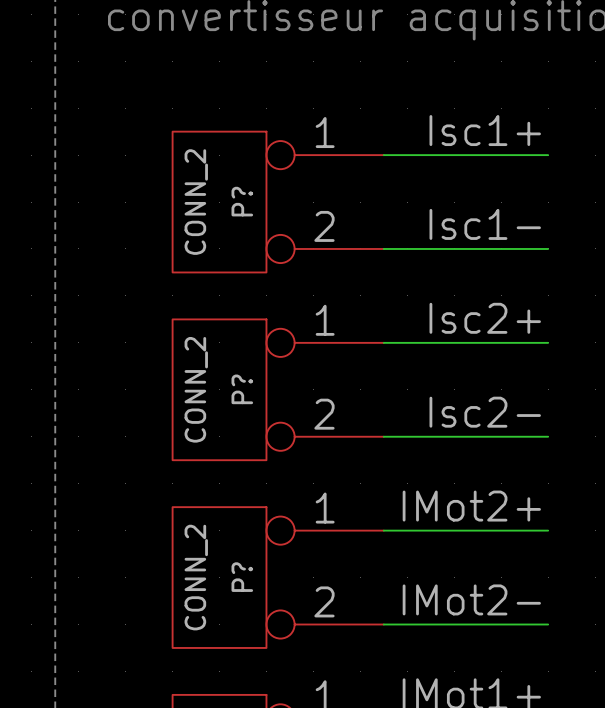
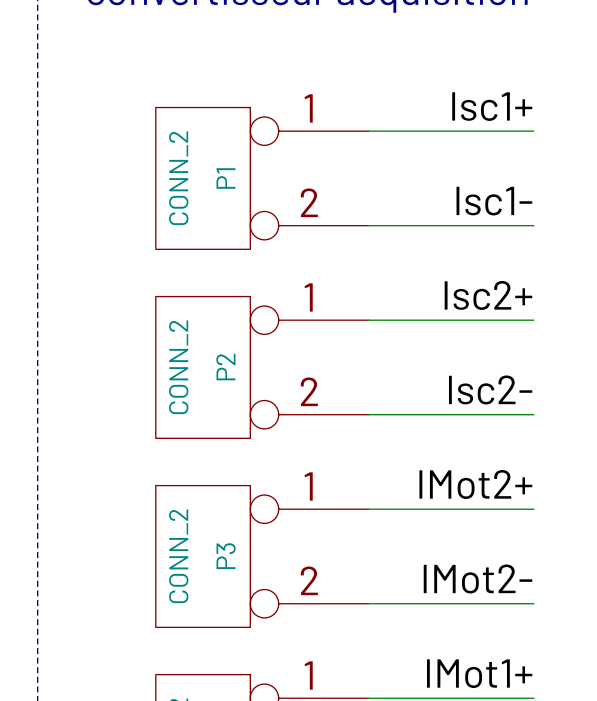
P? name: P? (242, 201) -> P1 (225, 178)
P? name: P? (242, 389) -> P2 (225, 367)
P? name: P? (242, 577) -> P3 (226, 556)

